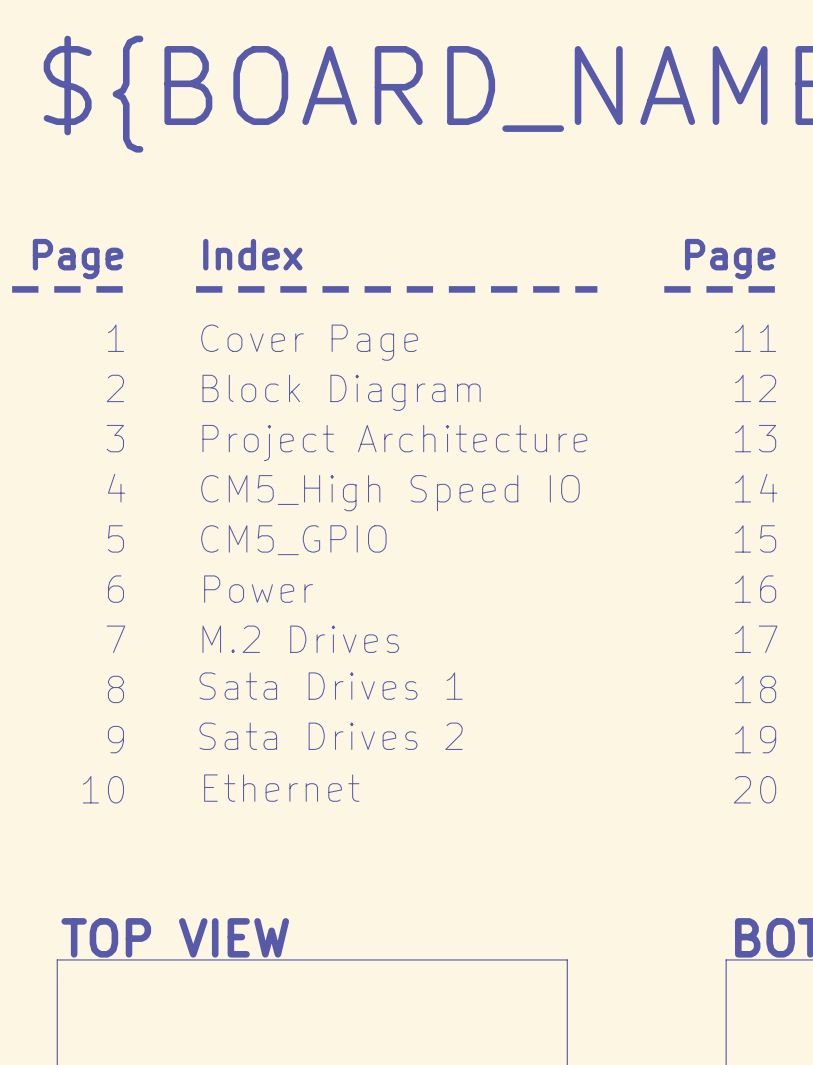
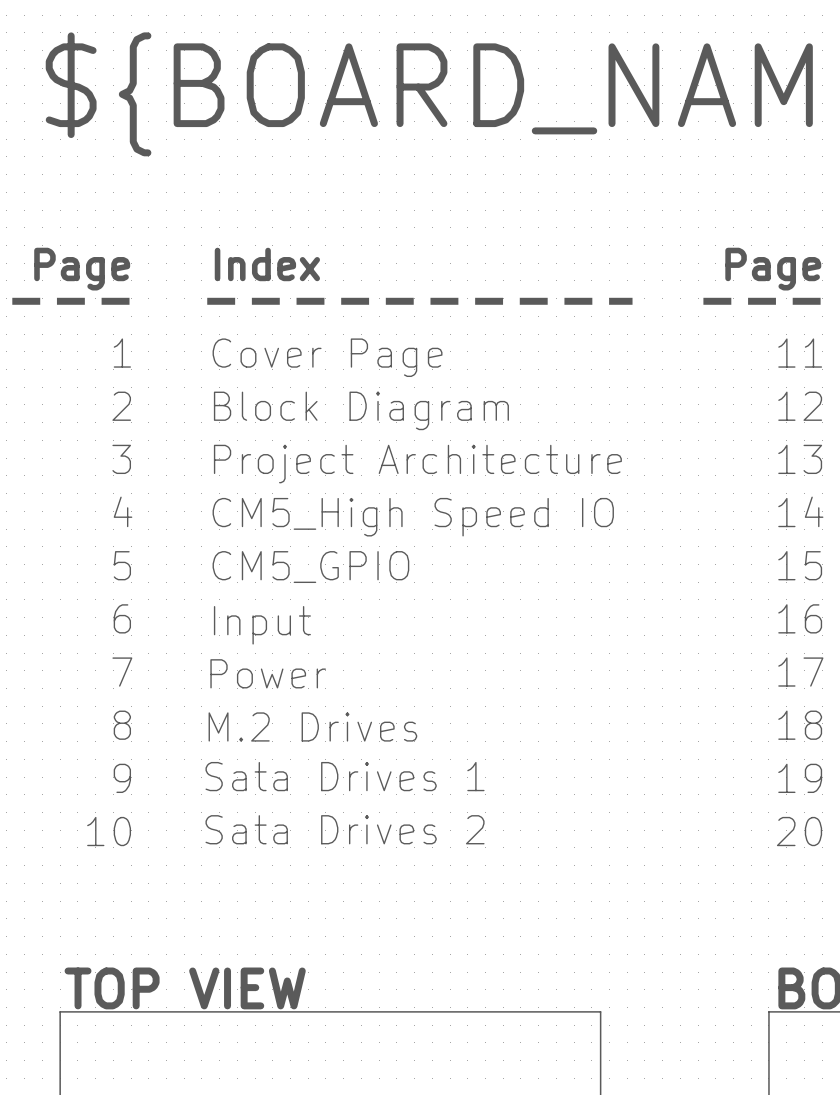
text position: Power (258, 589) -> Power (268, 673)
text: none -> Input (262, 625)
text position: M.2 Drives (300, 639) -> M.2 Drives (312, 726)
text position: Sata Drives 1 (331, 686) -> Sata Drives 1 (345, 776)
text position: Sata Drives 2 (331, 736) -> Sata Drives 2 (345, 829)
text: Ethernet (281, 788) -> none

